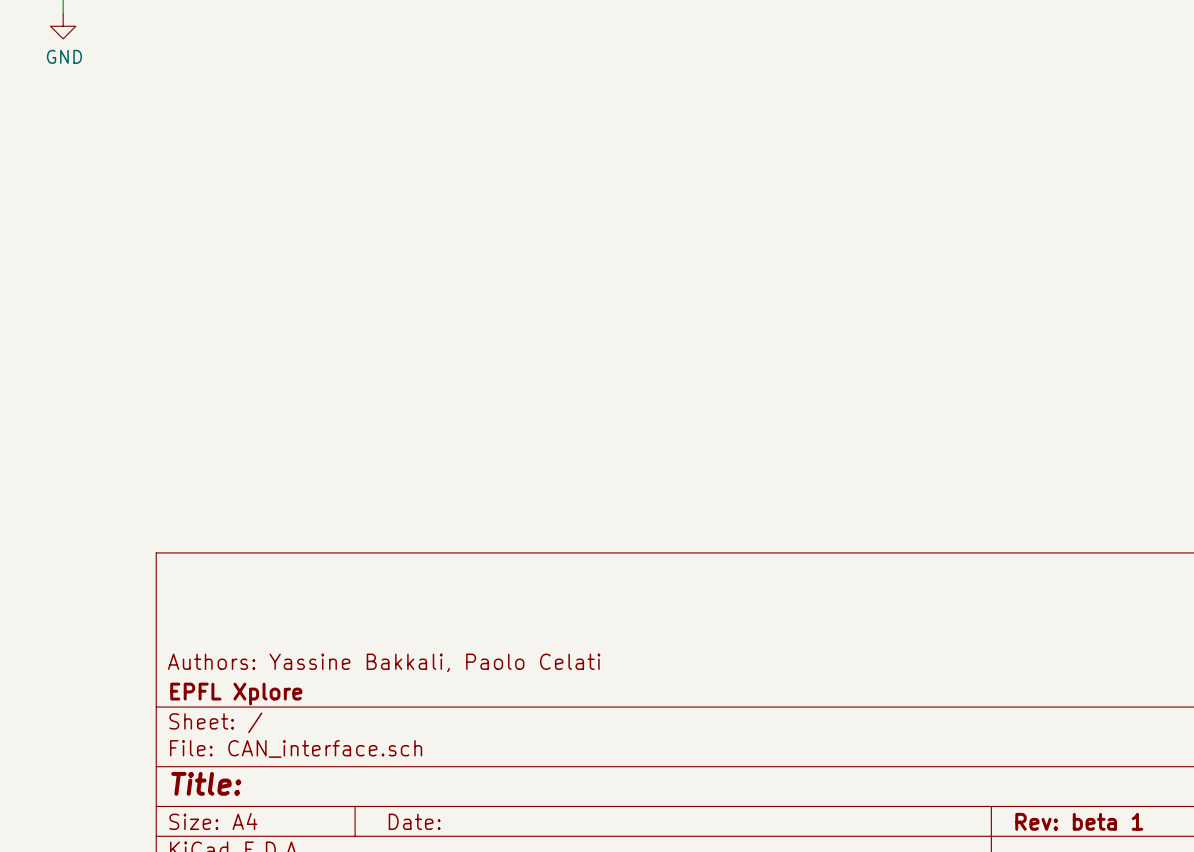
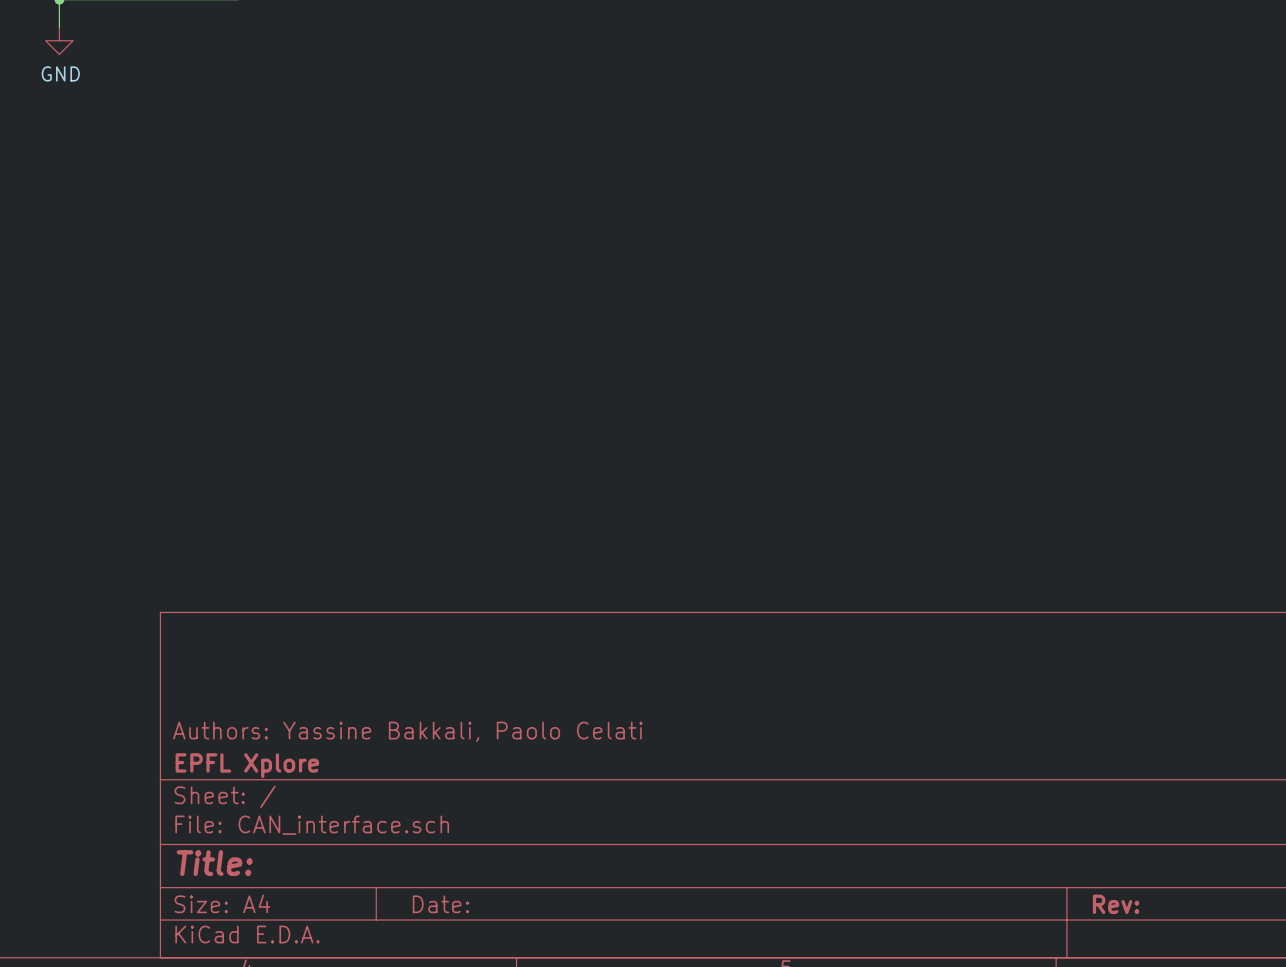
title block: Rev: beta 1 (1079, 821) -> Rev: (1116, 904)

